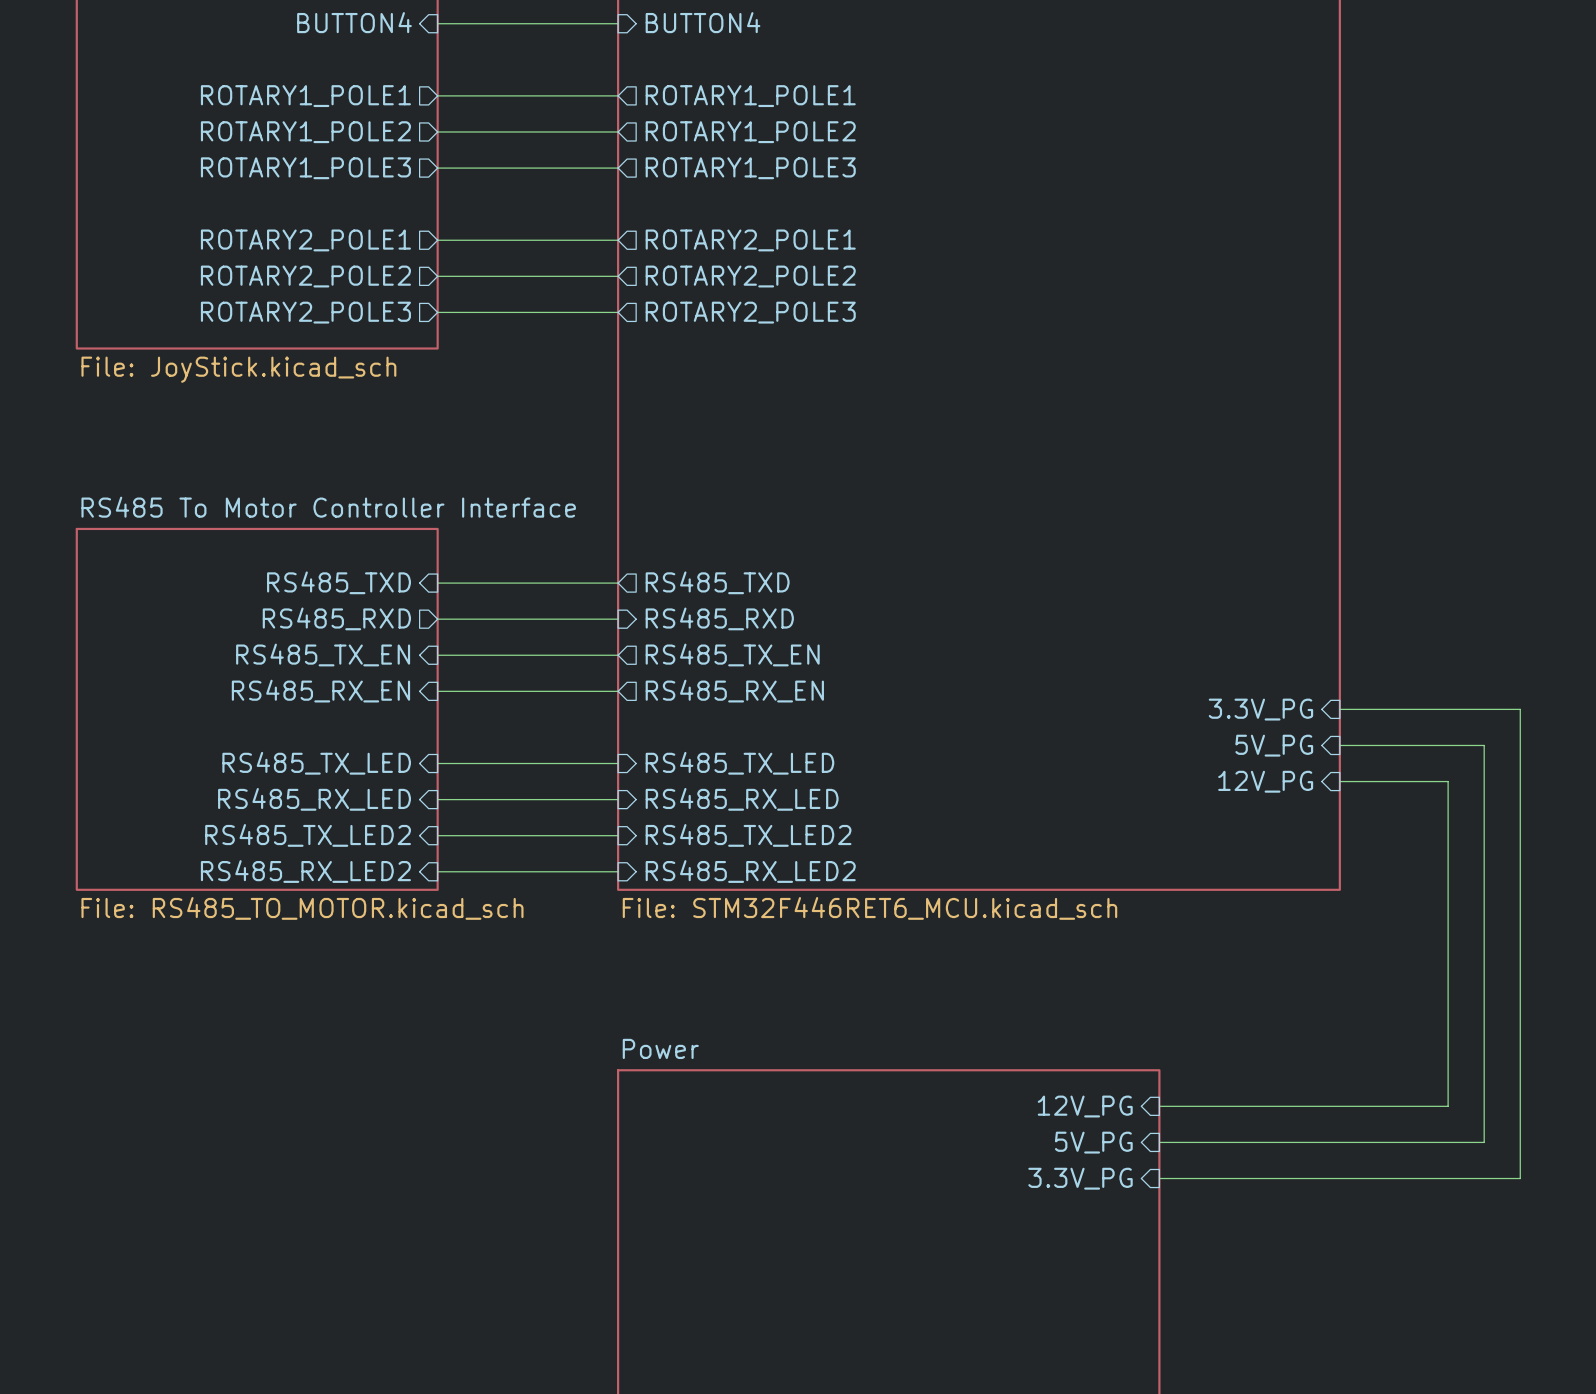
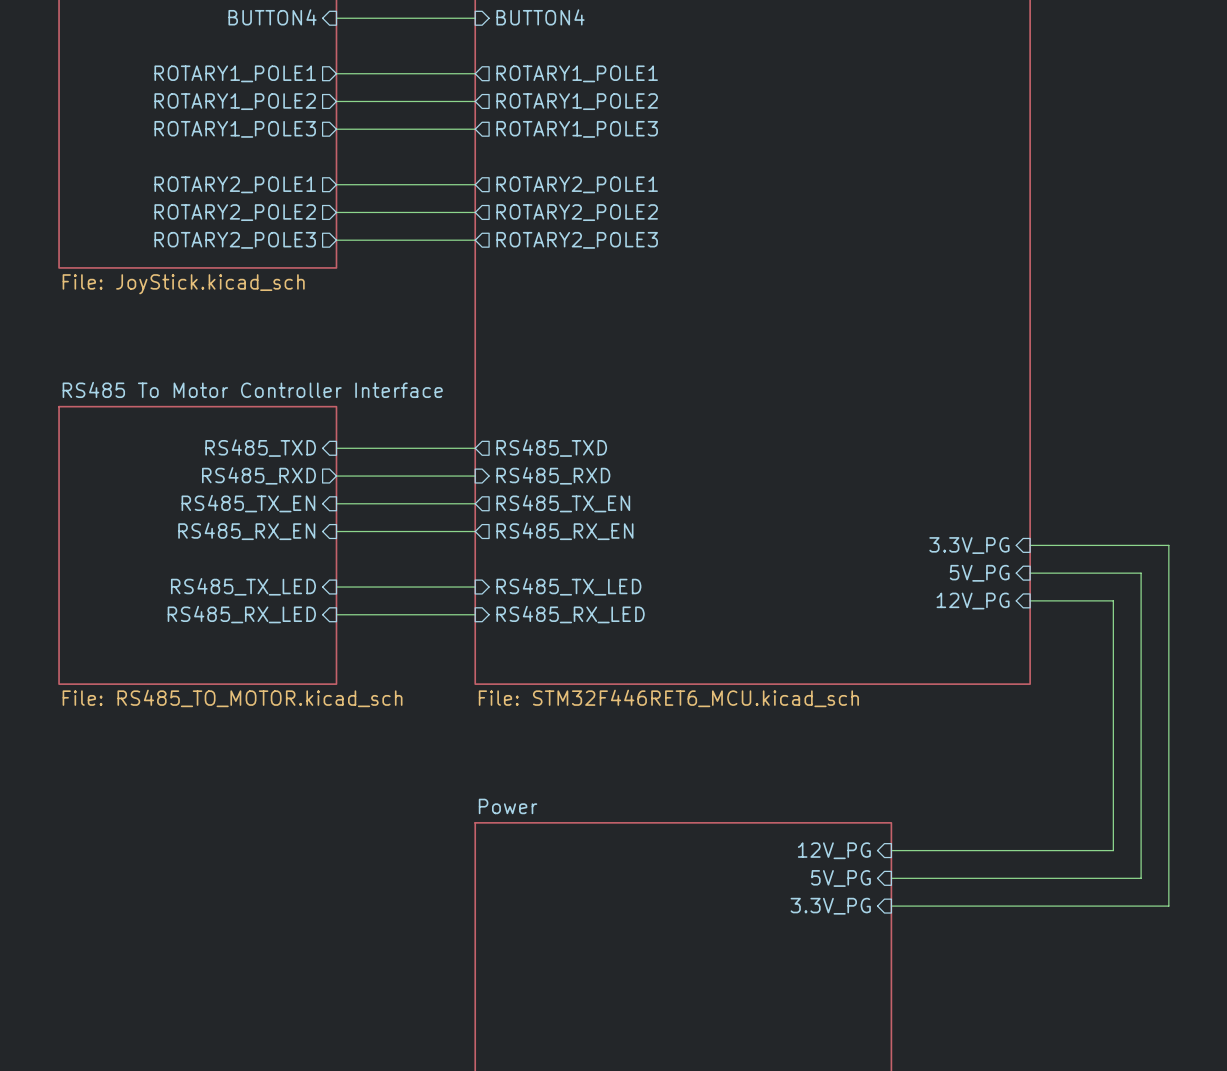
sheet pin: RS485_TX_LED2 (308, 835) -> none
wire: (437, 835) (618, 835) -> none
sheet pin: RS485_TX_LED2 (748, 835) -> none
sheet pin: RS485_RX_LED2 (305, 871) -> none
wire: (437, 871) (618, 871) -> none
sheet pin: RS485_RX_LED2 (750, 871) -> none

